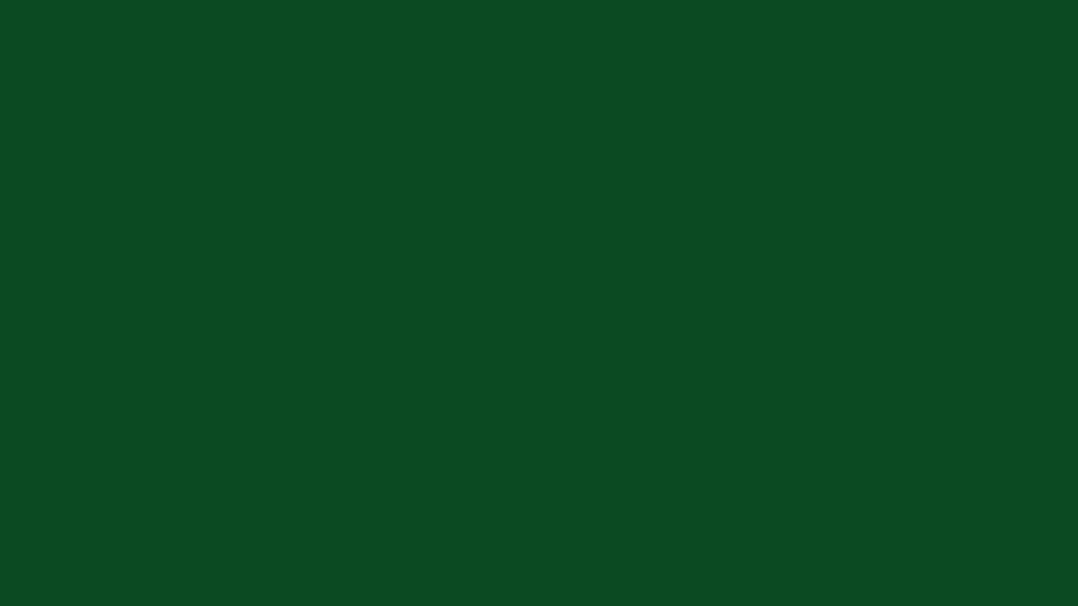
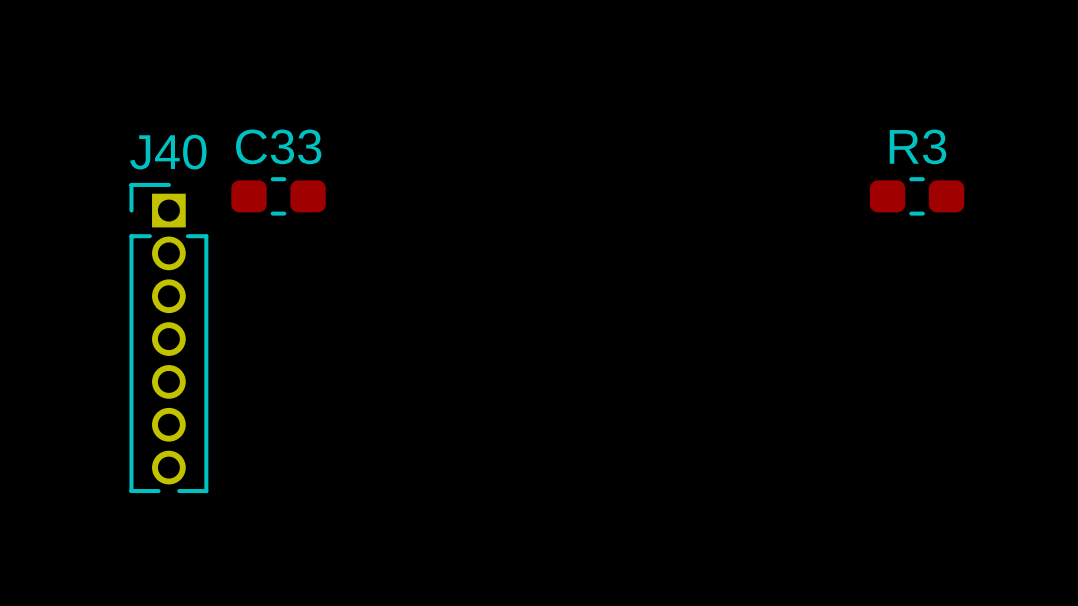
C33: none -> (278, 196)
R3: none -> (917, 196)
J40: none -> (168, 337)

